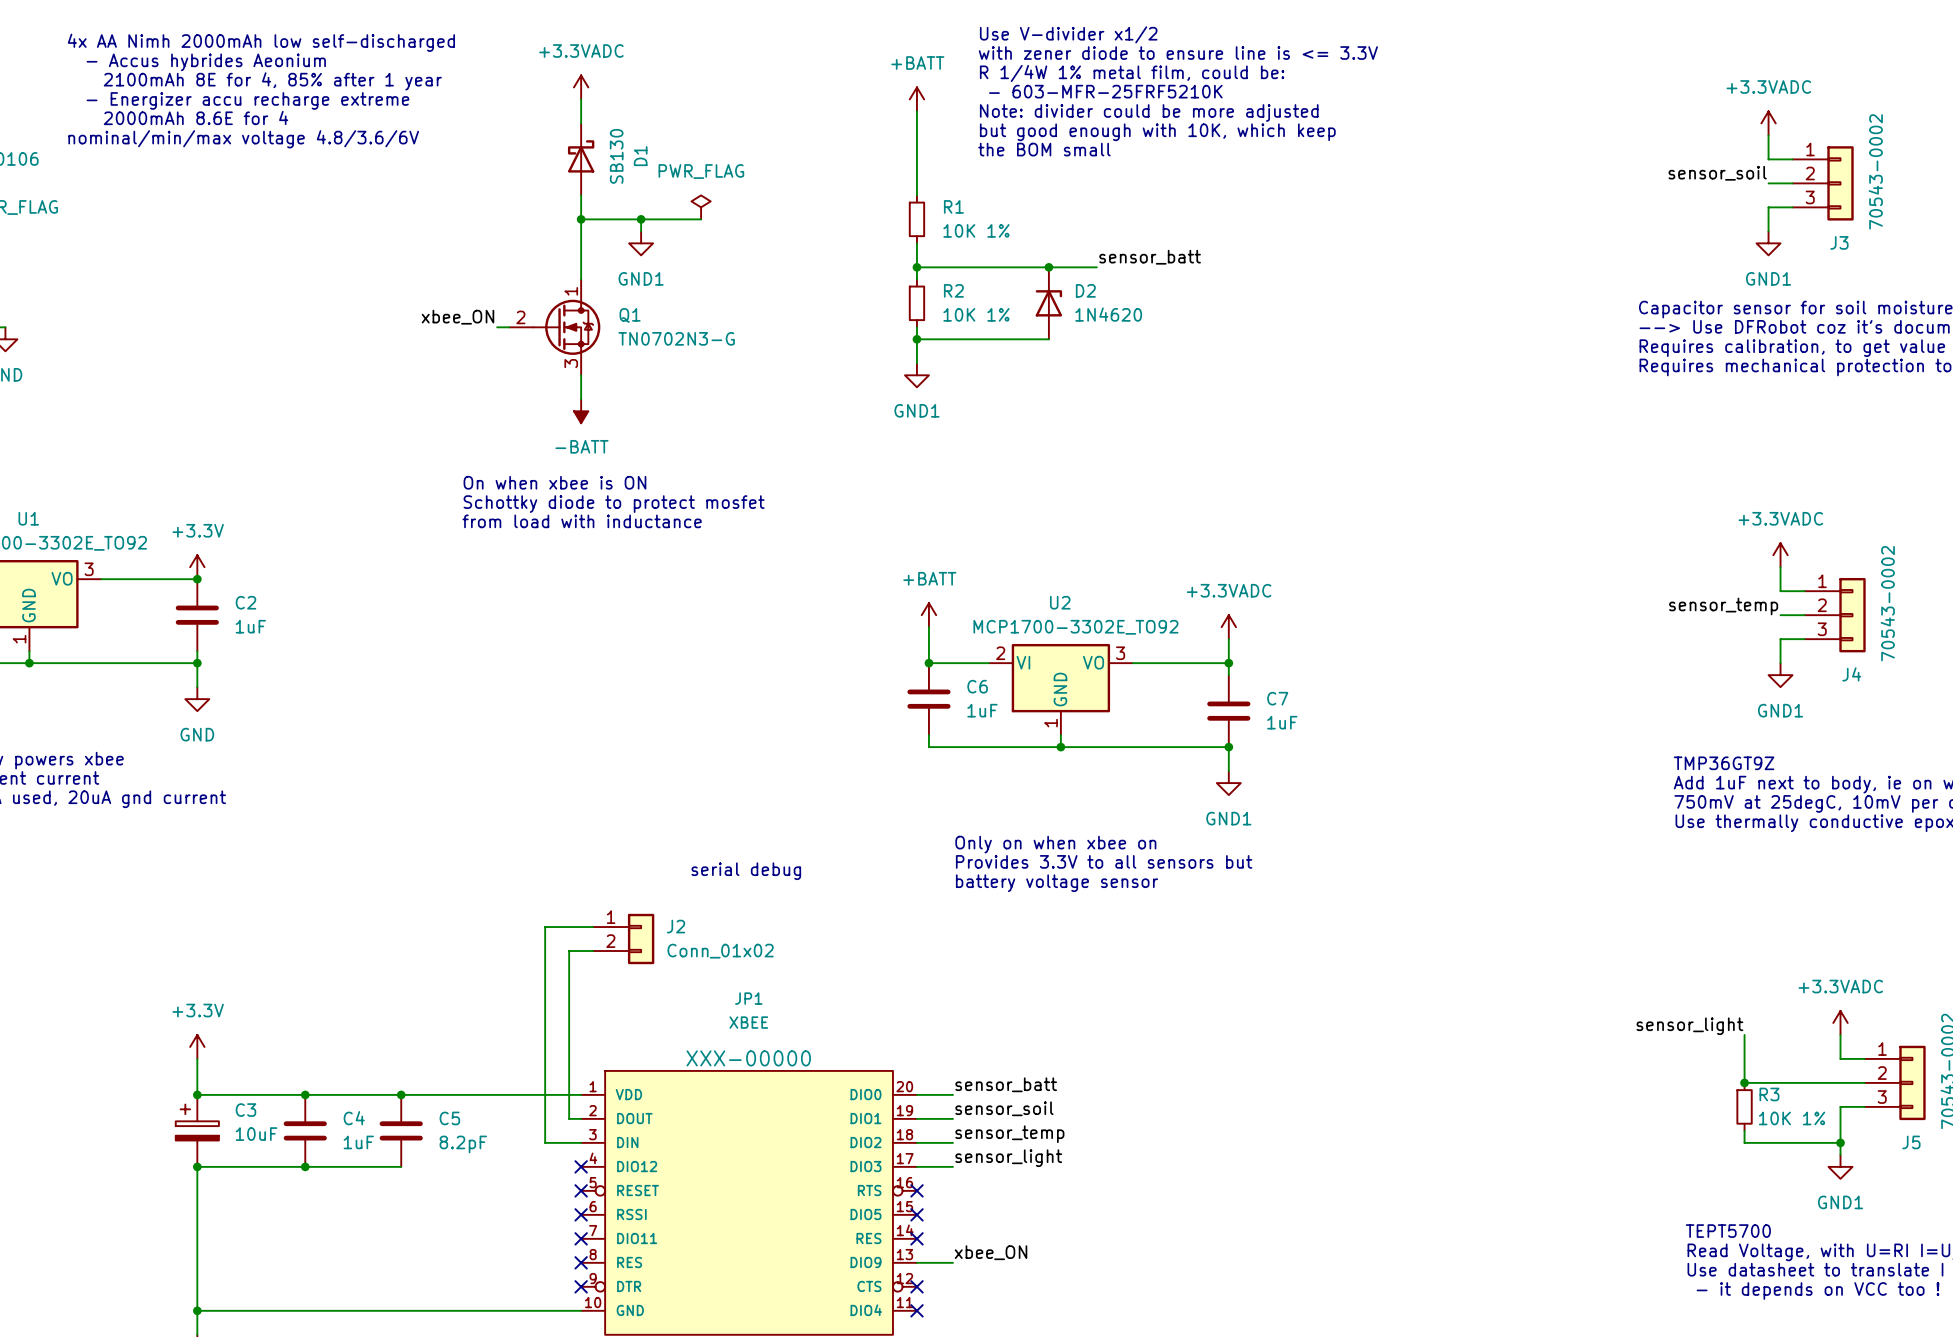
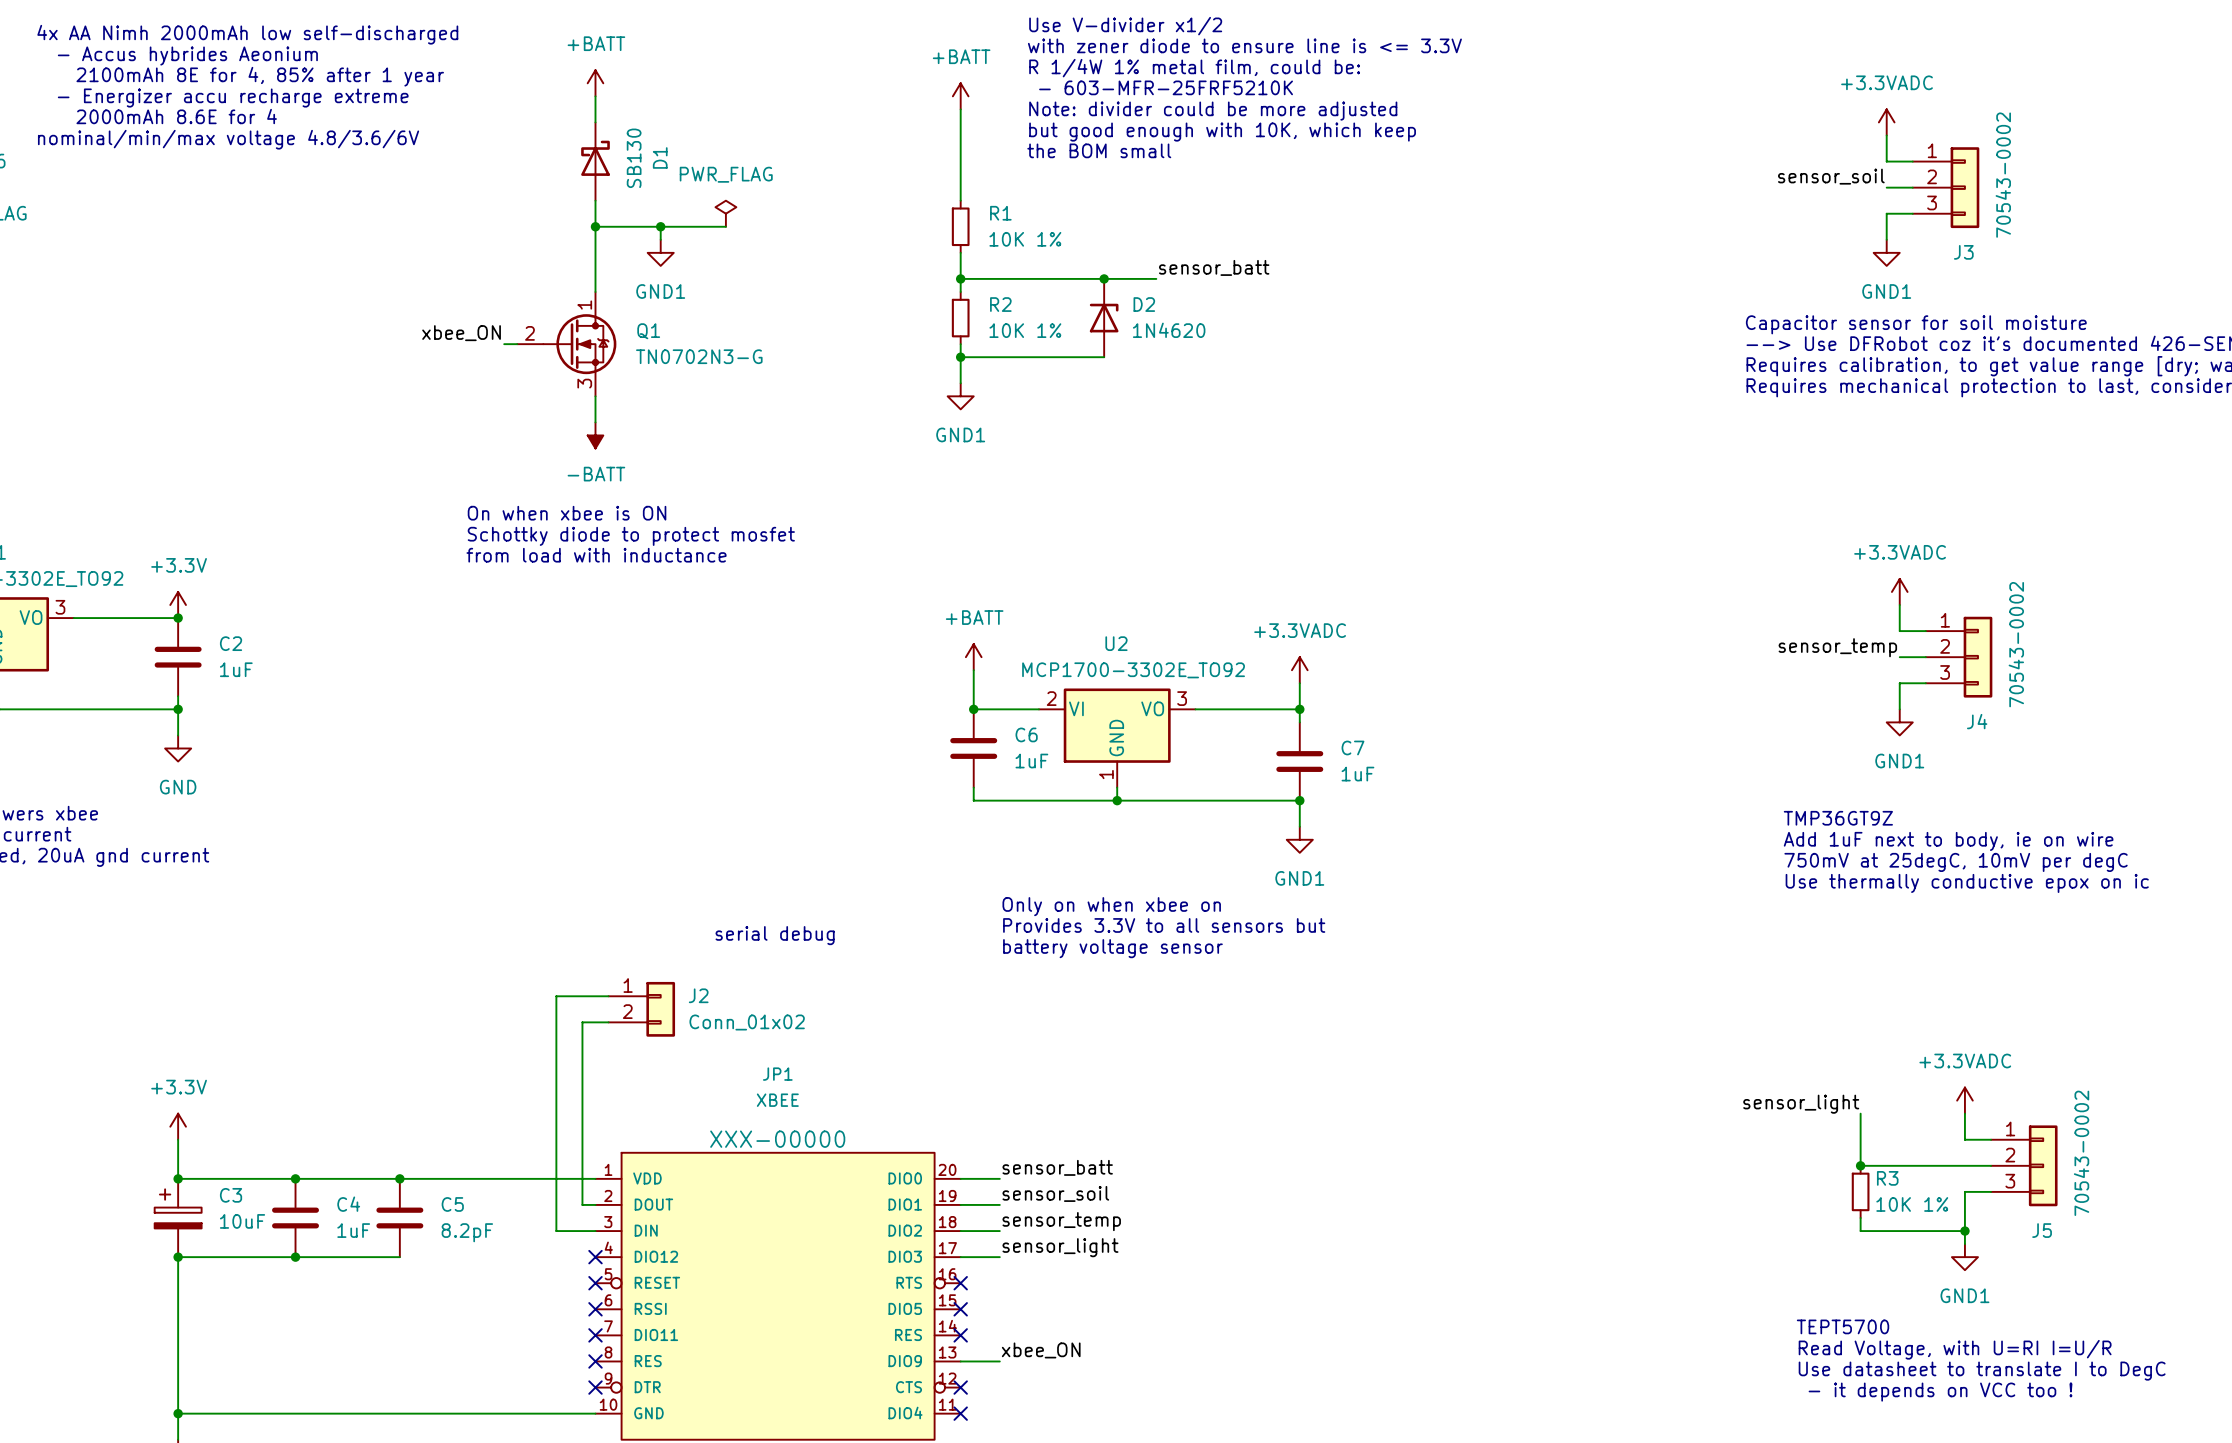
power symbol: +3.3VADC (581, 87) -> +BATT (595, 83)

